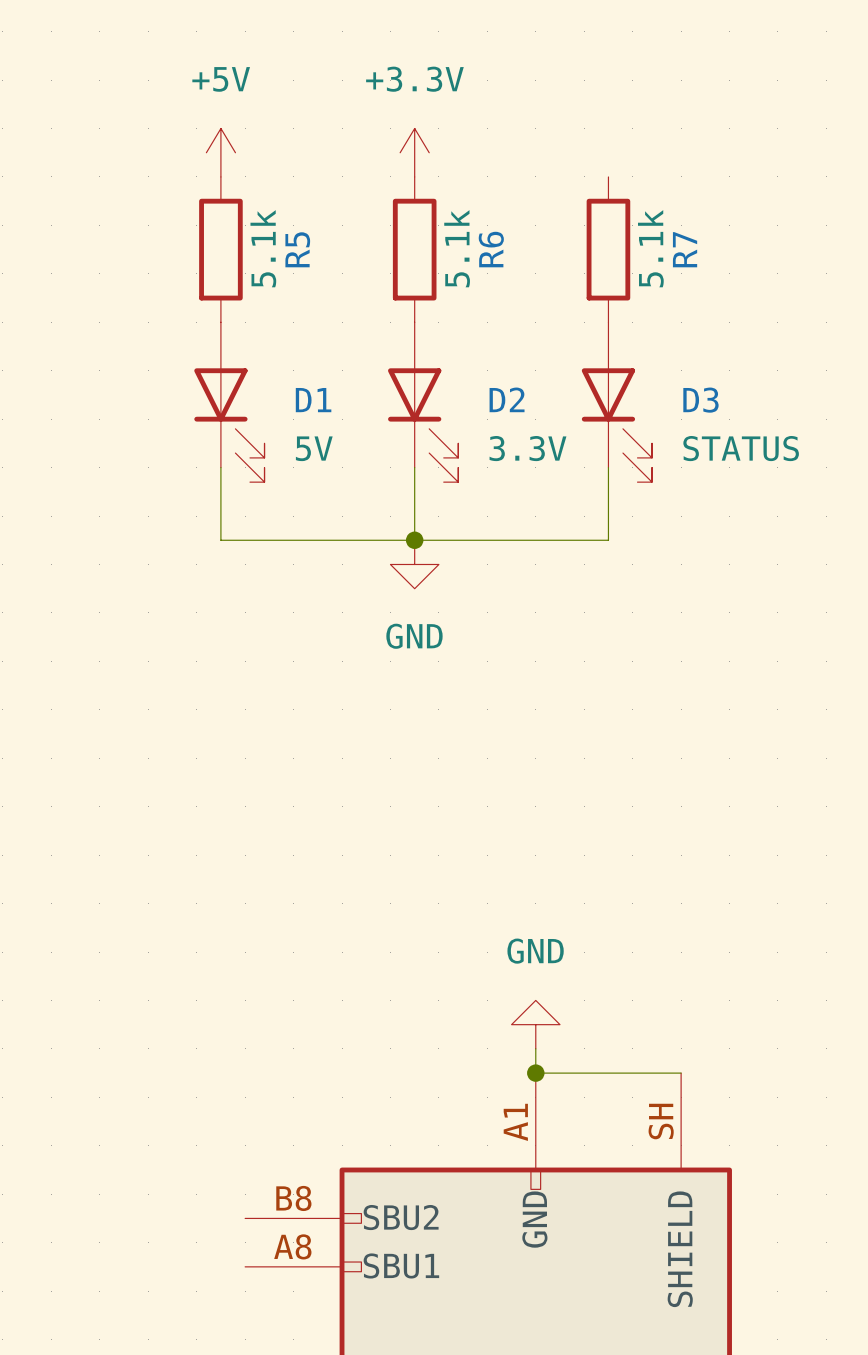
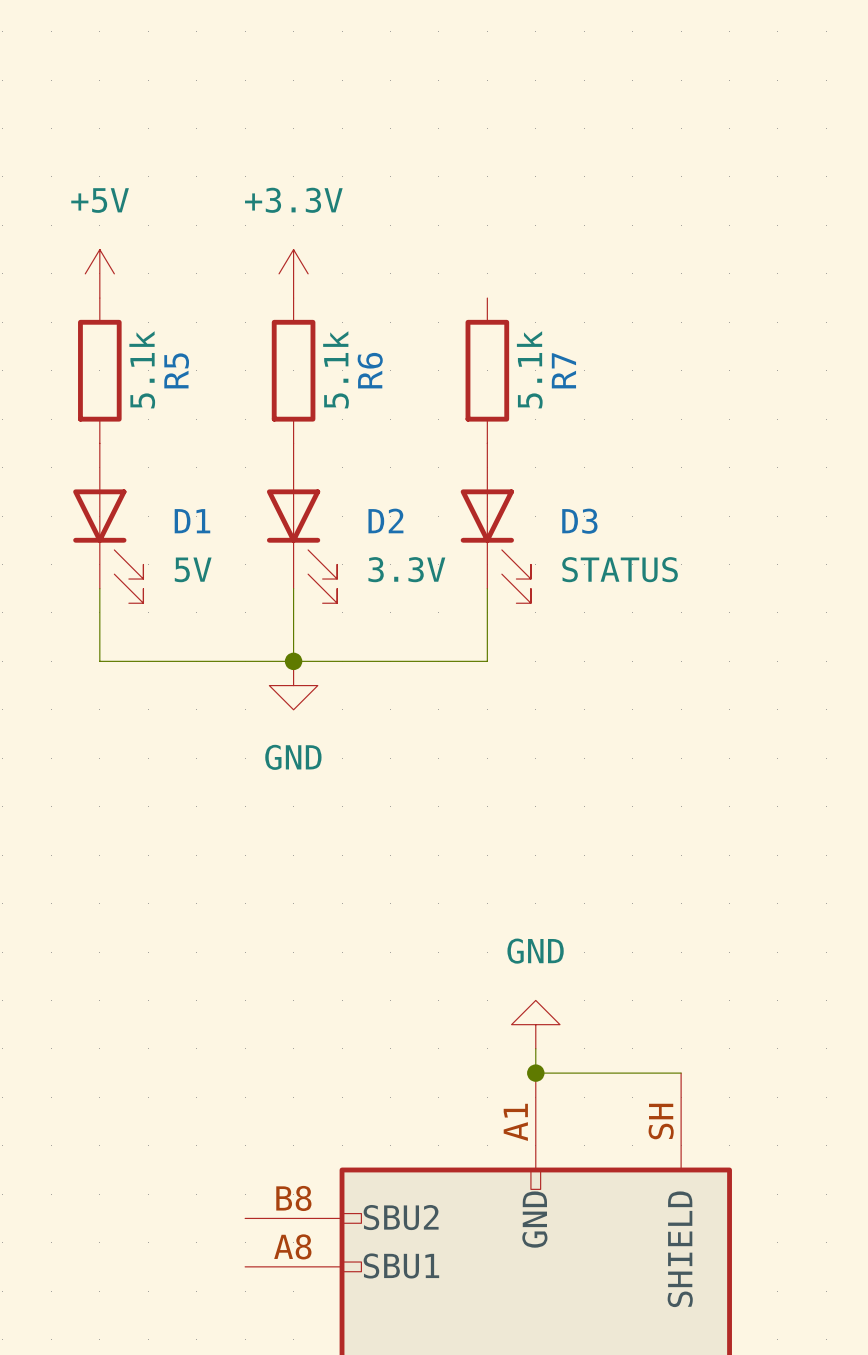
power symbol position: +5V (220, 152) -> +5V (99, 273)
power symbol position: +3.3V (414, 152) -> +3.3V (293, 273)
R5 position: (220, 249) -> (99, 370)
R6 position: (414, 249) -> (293, 370)
R7 position: (608, 249) -> (487, 370)
D1 position: (229, 402) -> (108, 523)
D2 position: (423, 402) -> (302, 523)
D3 position: (616, 402) -> (495, 523)
wire: (220, 467) (220, 540) (608, 540) (608, 467) -> (99, 588) (99, 661) (487, 661) (487, 588)
wire: (414, 467) (414, 540) -> (293, 588) (293, 661)
junction: (414, 540) -> none
power symbol position: GND (414, 564) -> GND (293, 685)
junction: none -> (293, 661)

